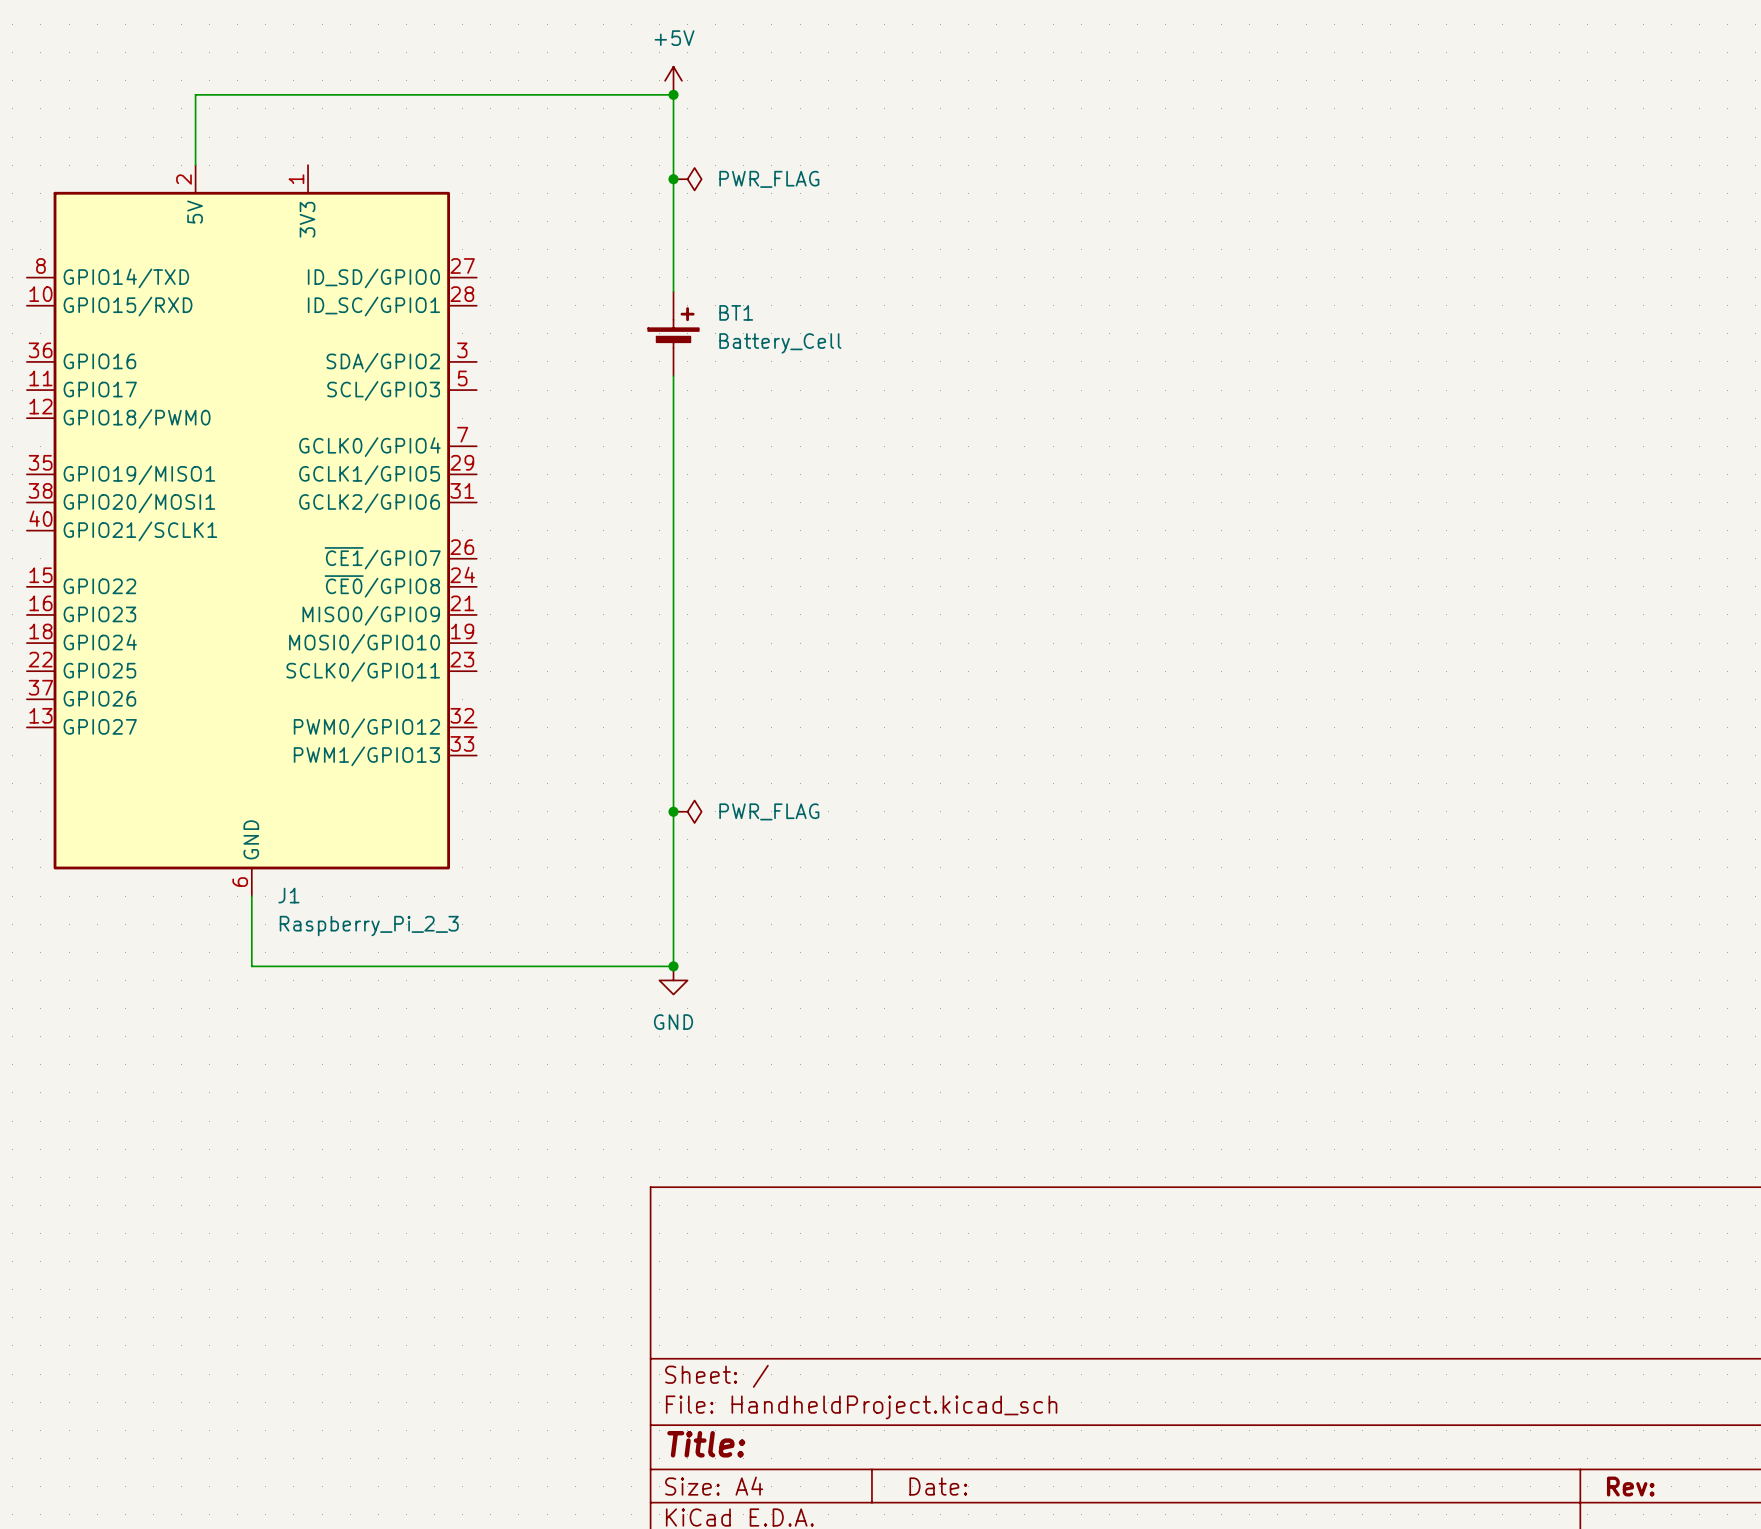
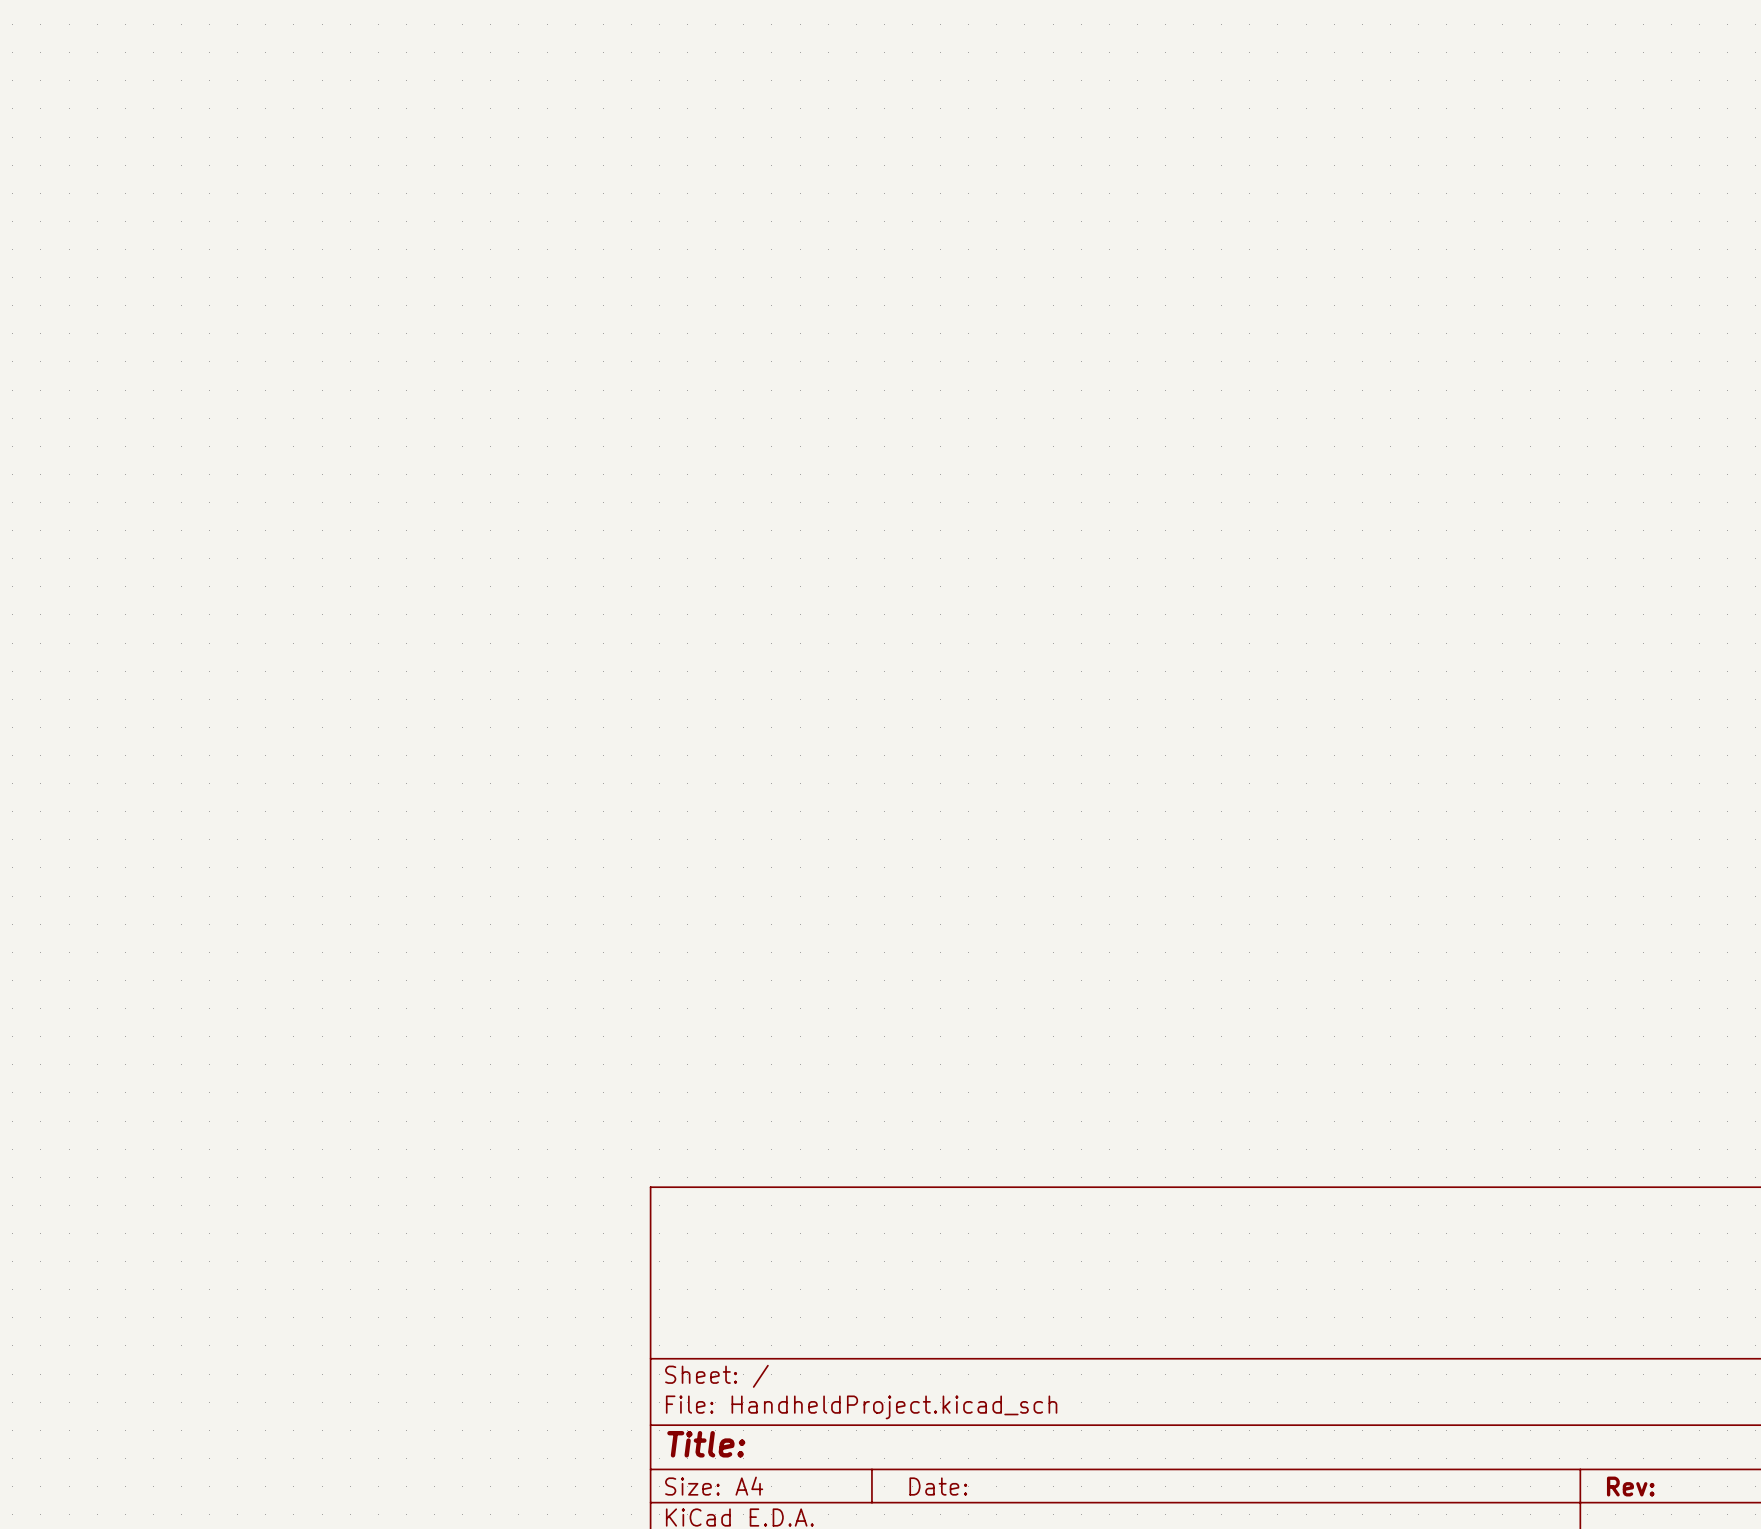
power symbol: +5V (673, 80) -> none
junction: (673, 94) -> none
wire: (195, 165) (195, 94) (673, 94) (673, 291) -> none
junction: (673, 179) -> none
power symbol: PWR_FLAG (687, 179) -> none
BT1: Battery_Cell (673, 333) -> none
wire: (673, 376) (673, 966) (251, 966) (251, 896) -> none
J1: Raspberry_Pi_2_3 (251, 530) -> none
junction: (673, 811) -> none
power symbol: PWR_FLAG (687, 811) -> none
junction: (673, 966) -> none
power symbol: GND (673, 980) -> none

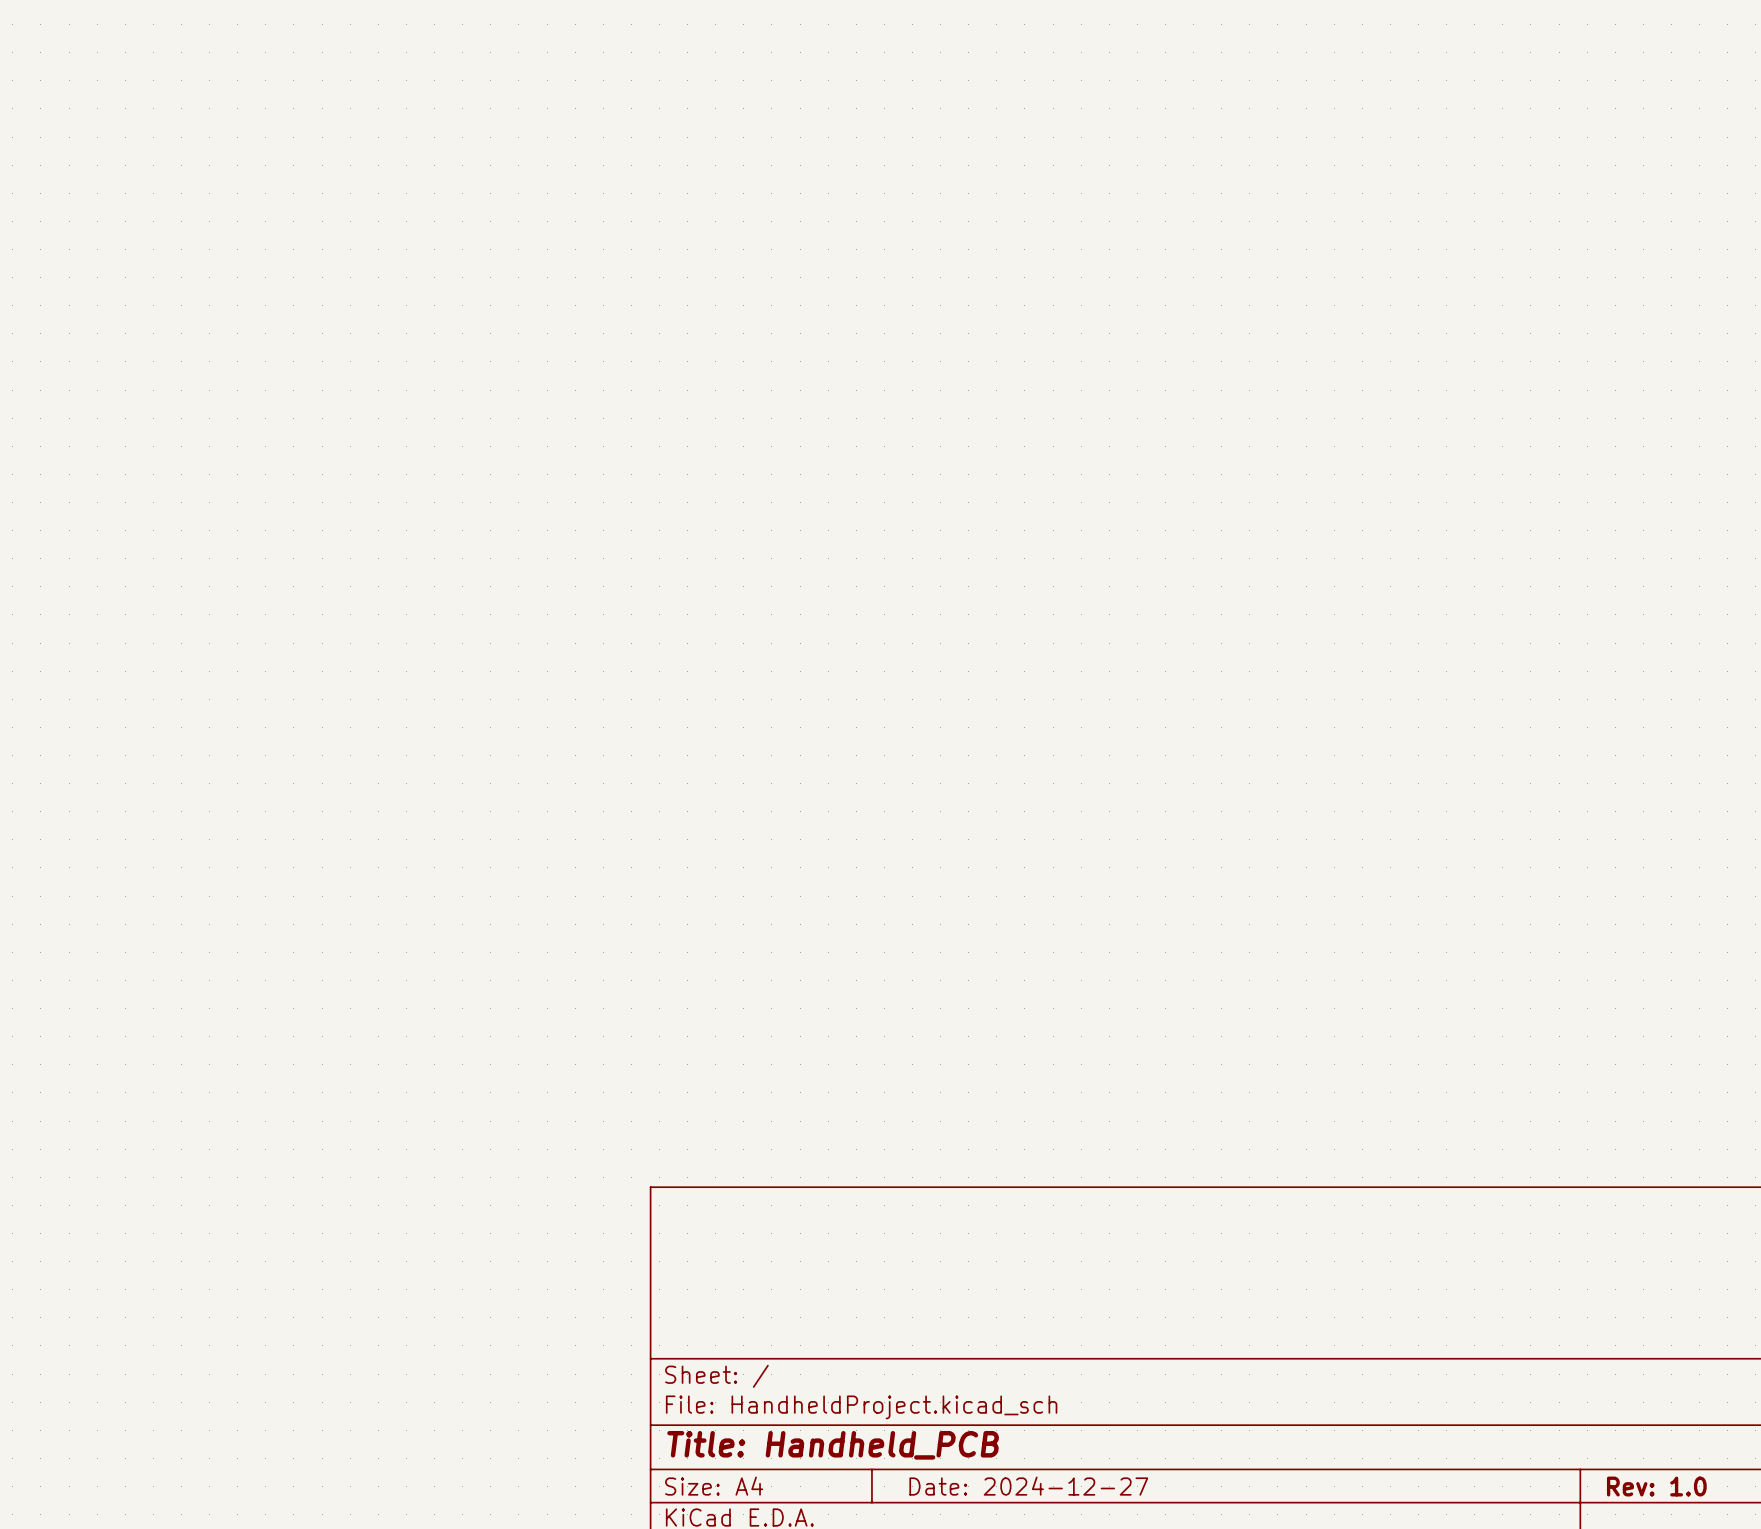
title block: Title: (706, 1444) -> Title: Handheld_PCB (833, 1445)
title block: Date: (938, 1486) -> Date: 2024-12-27 (1028, 1486)
title block: Rev: (1630, 1486) -> Rev: 1.0 (1656, 1486)

